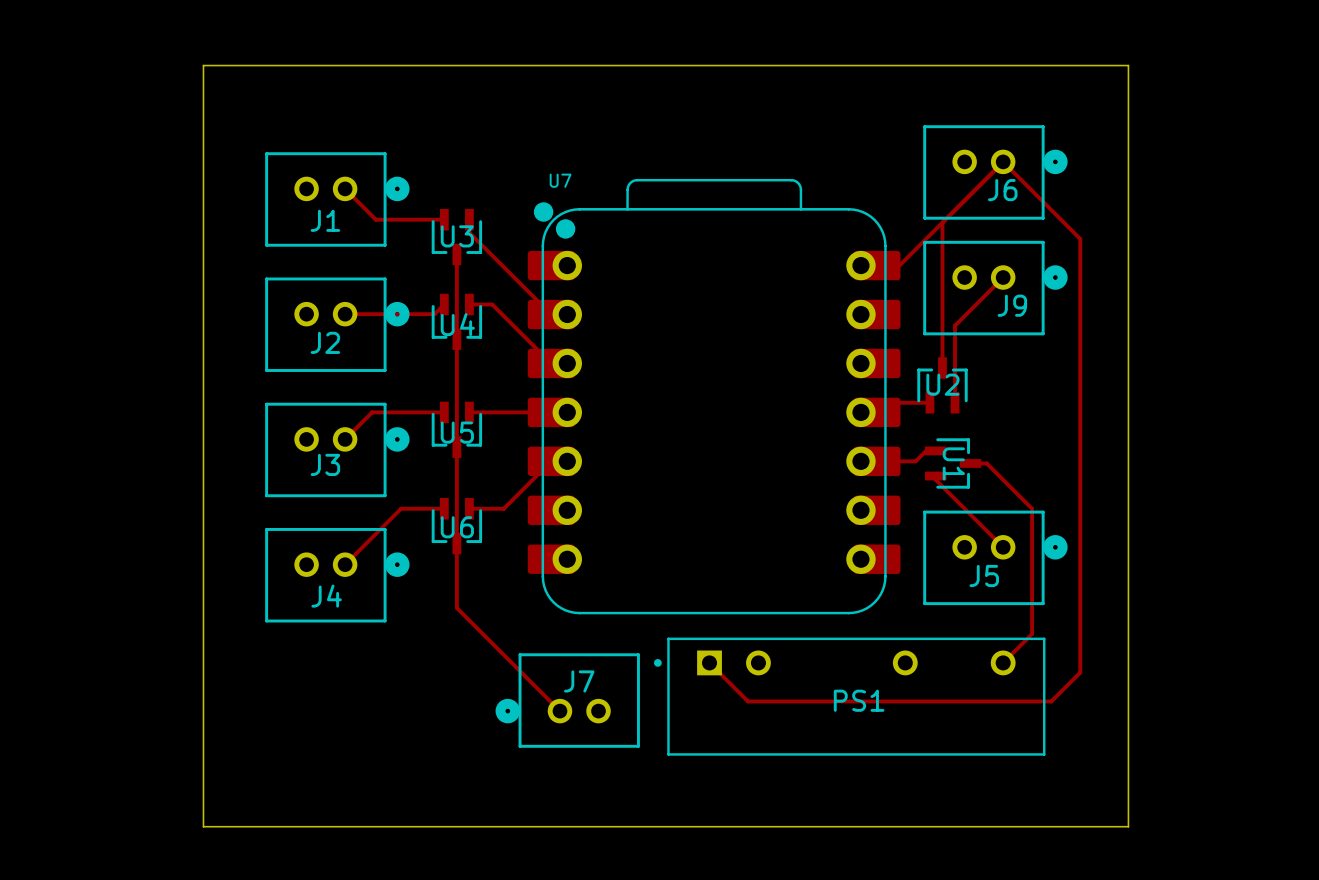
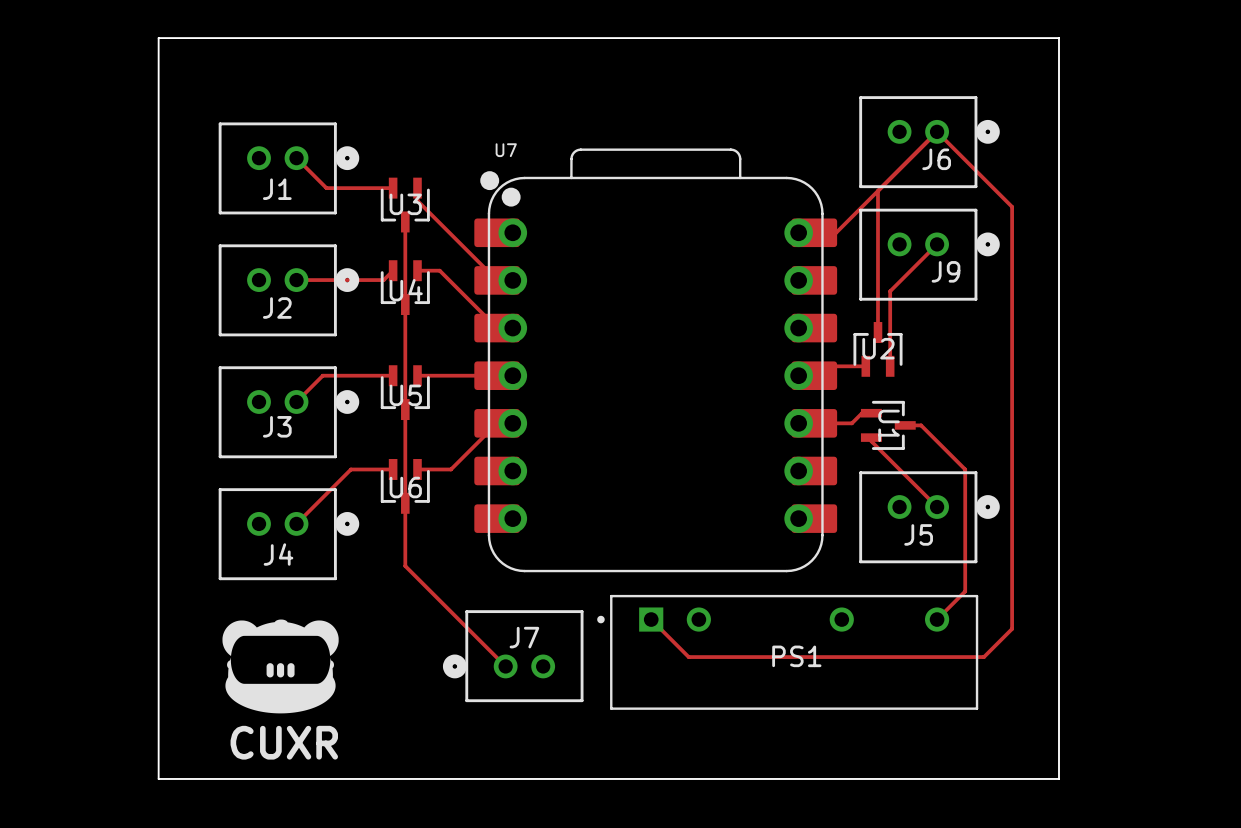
drawing: none -> [222, 619, 339, 714]
text: none -> CUXR (284, 742)

